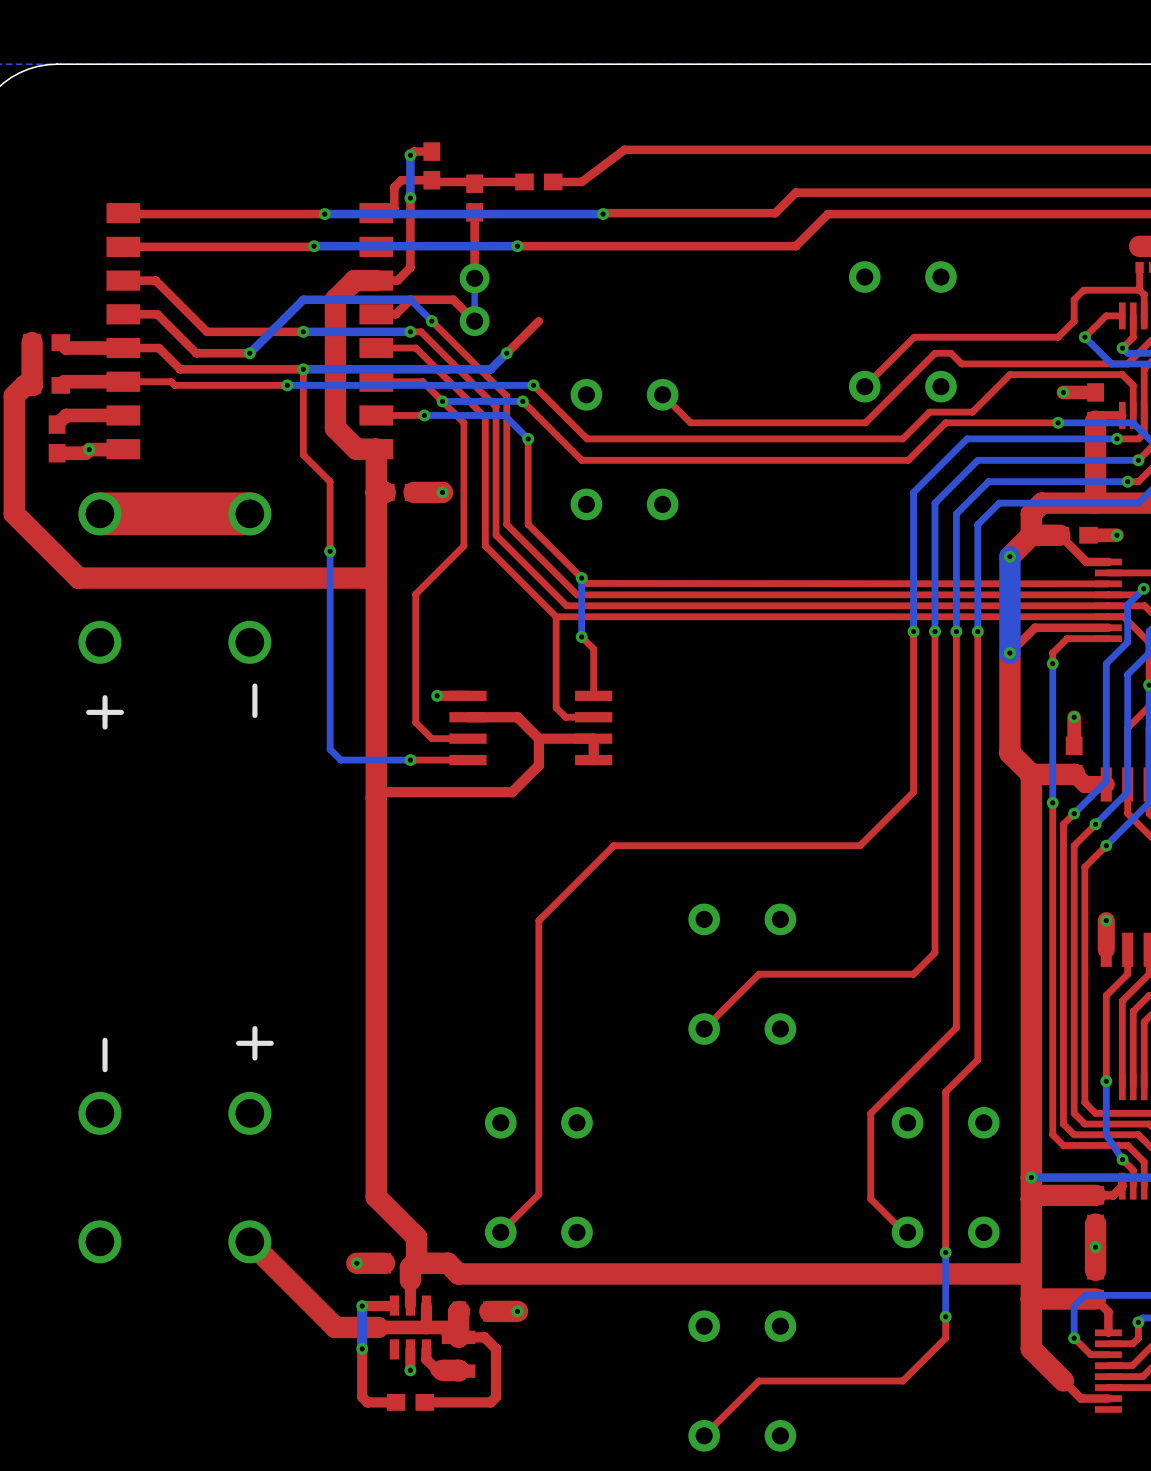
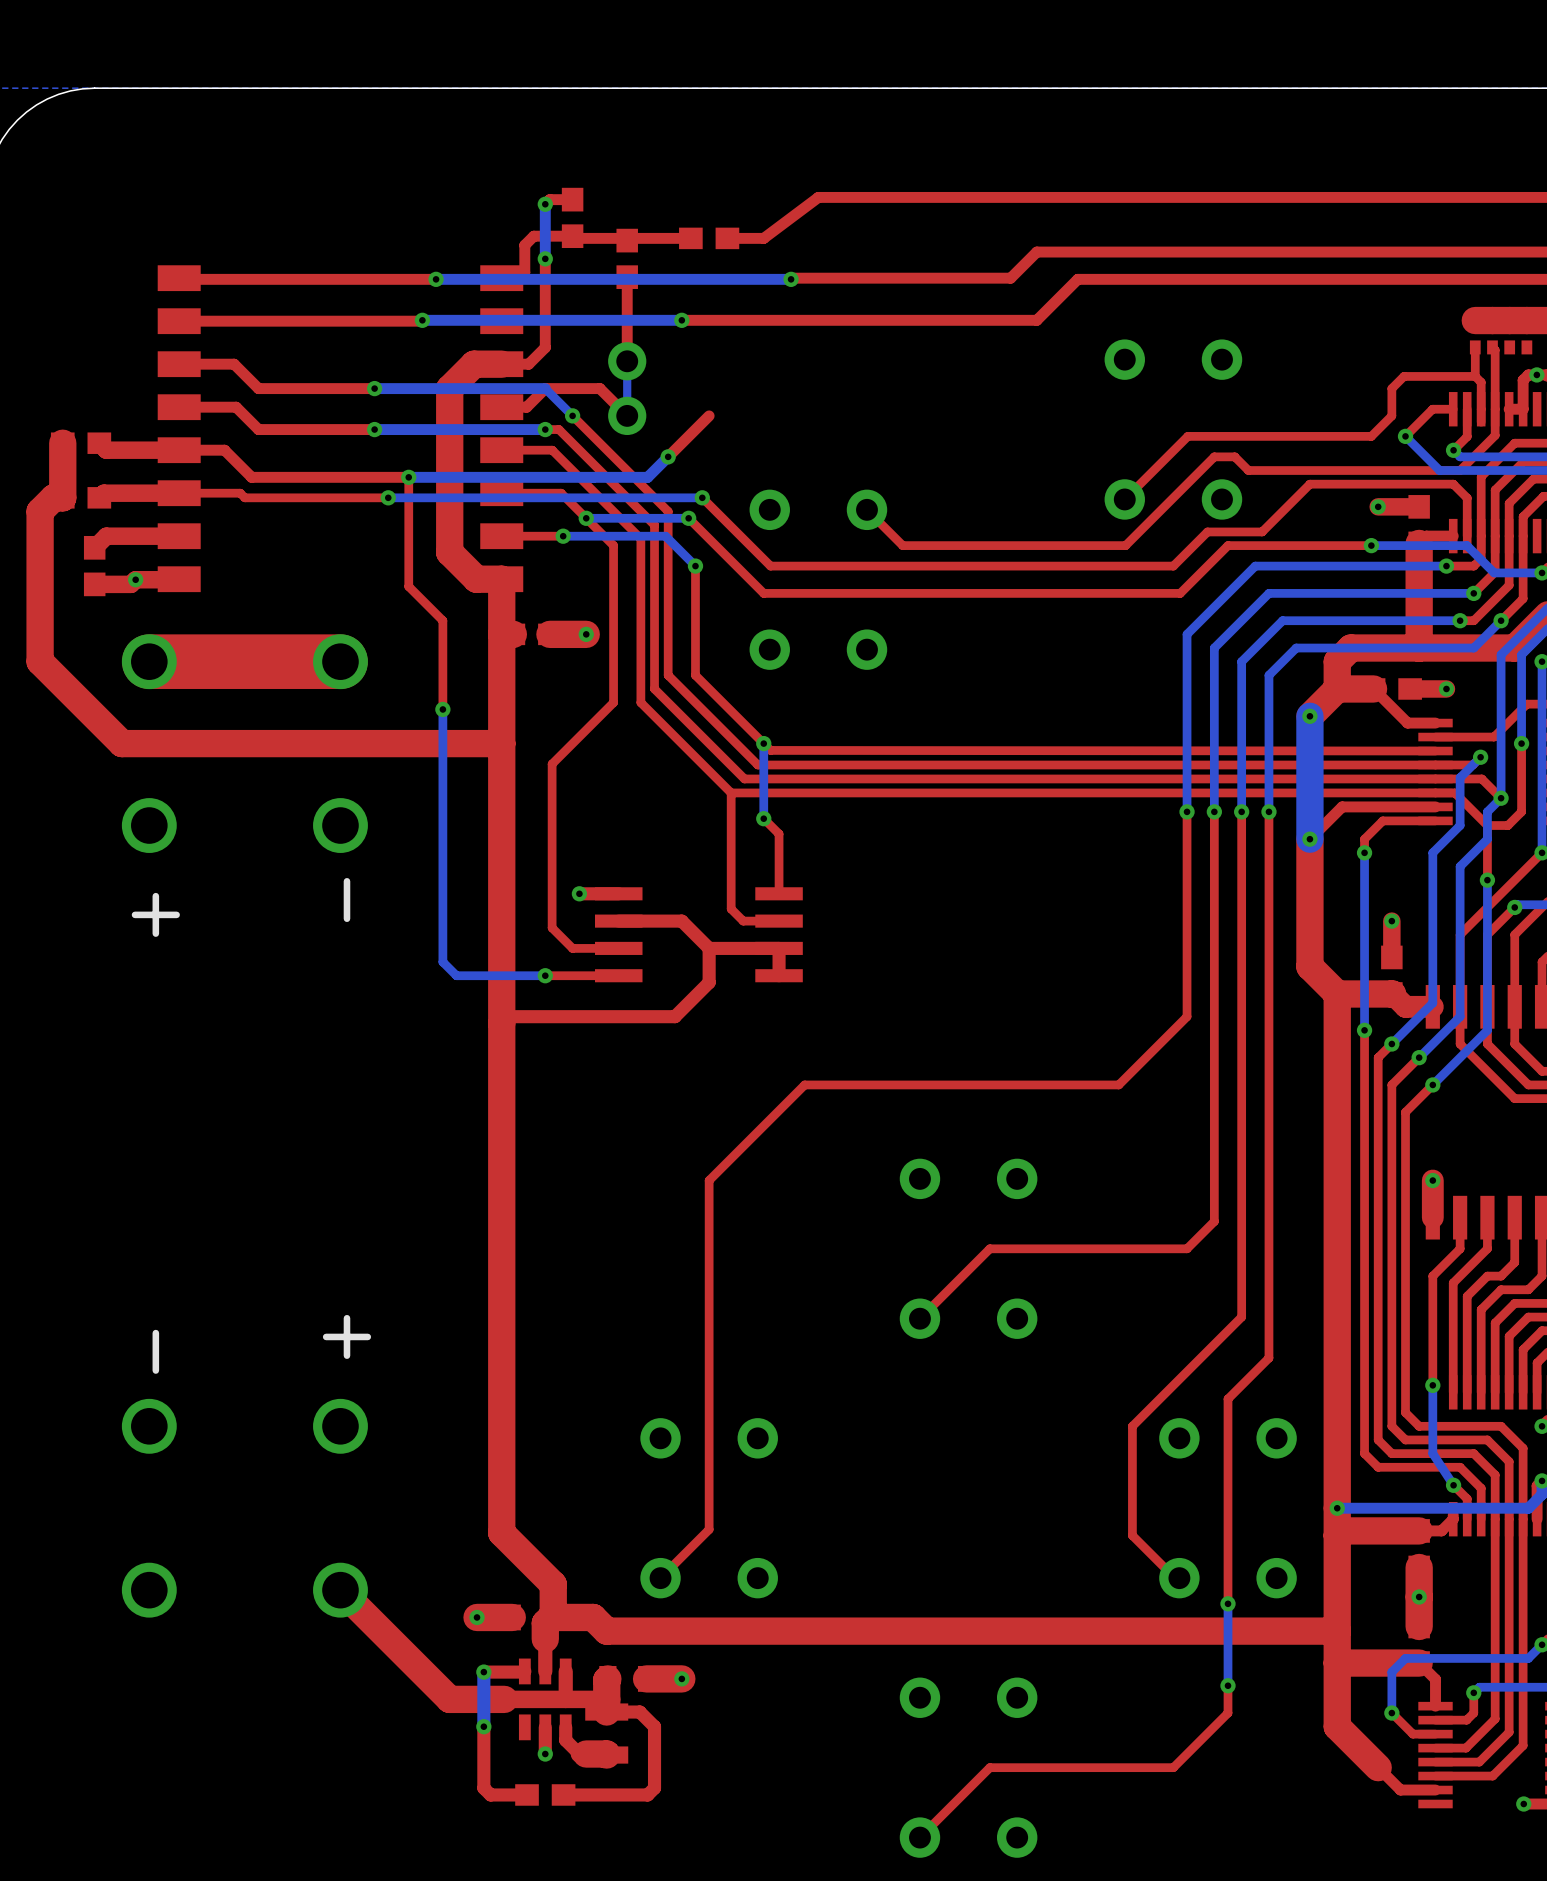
top track: (155, 280) (206, 331) -> (222, 407) (236, 407) (258, 429) (285, 429)
top track: none -> (220, 364) (234, 364) (258, 388) (374, 388)
via: none -> (374, 388)
bottom track: (303, 299) (249, 353) -> (408, 388) (374, 388)
top track: (157, 314) (196, 353) (249, 353) -> none
via: none -> (374, 429)
top track: (303, 331) (276, 331) -> none
bottom track: none -> (408, 429) (374, 429)
via: (303, 331) -> none
via: (249, 353) -> none

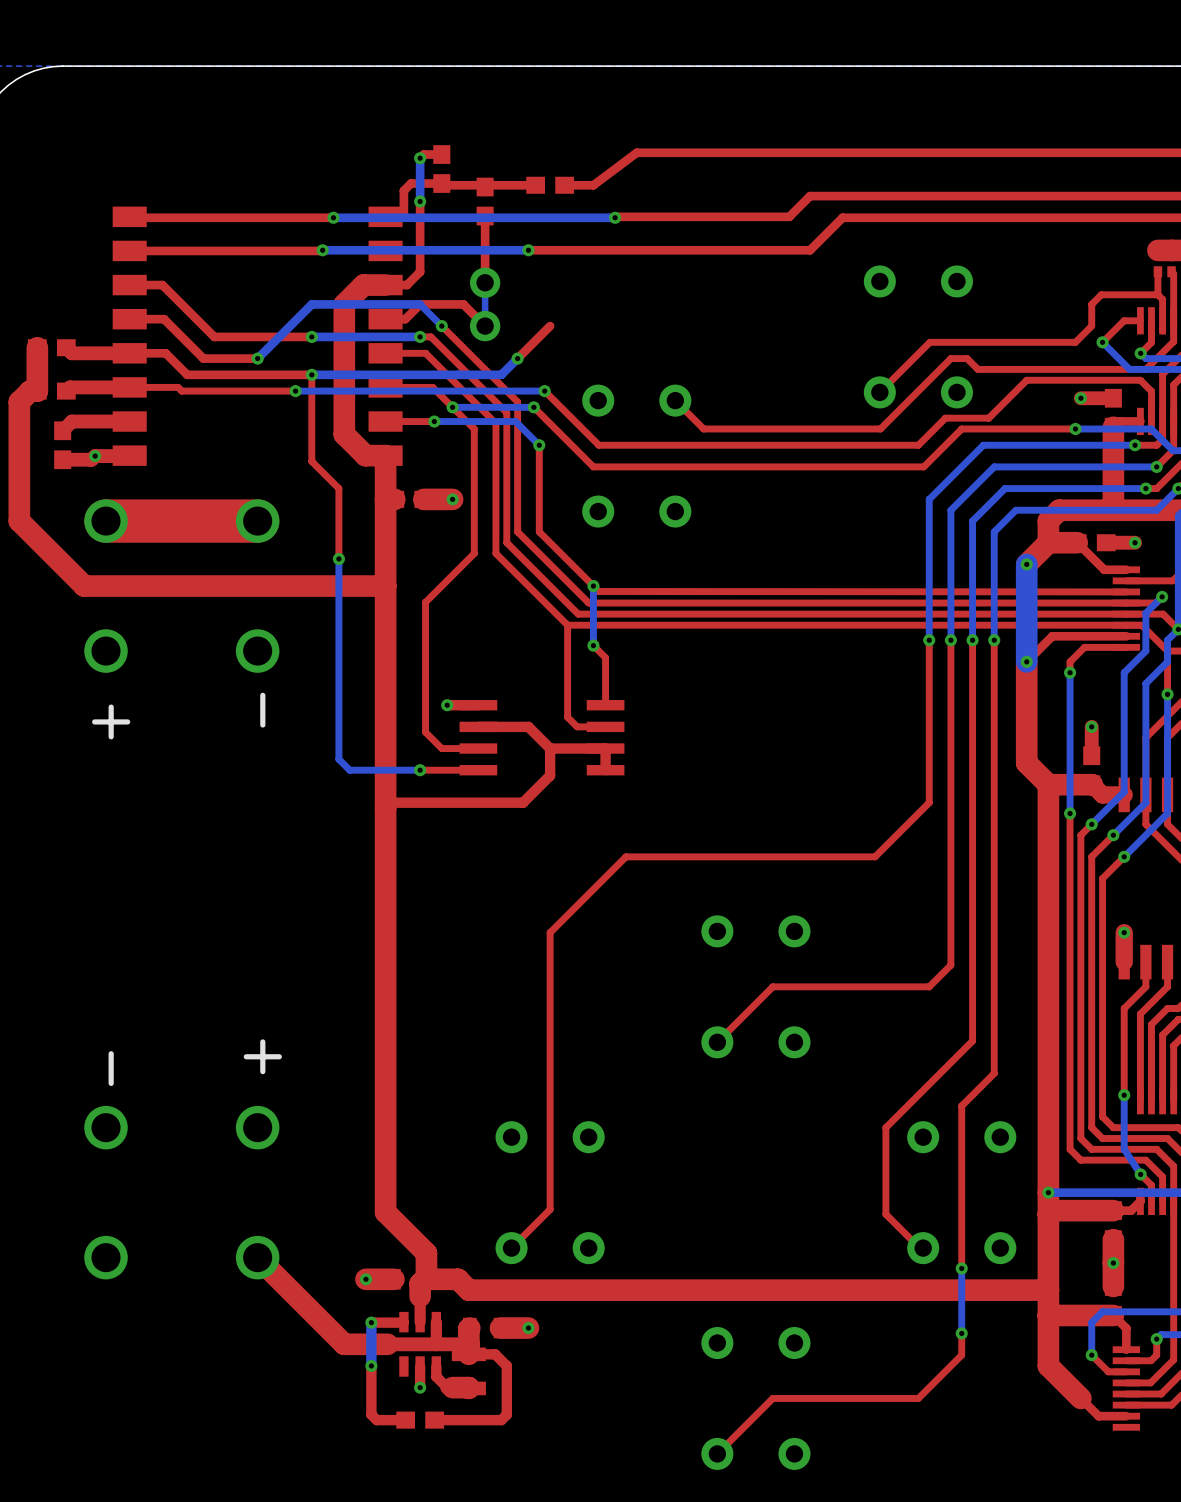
top track: (220, 364) (234, 364) (258, 388) (374, 388) -> none
via: (374, 388) -> none
bottom track: (408, 388) (374, 388) -> (311, 304) (257, 358)
top track: (222, 407) (236, 407) (258, 429) (285, 429) -> (162, 285) (214, 336)
top track: none -> (164, 319) (203, 358) (257, 358)
via: (374, 429) -> none
top track: none -> (311, 336) (284, 336)
bottom track: (408, 429) (374, 429) -> none
via: none -> (311, 336)
via: none -> (257, 358)

